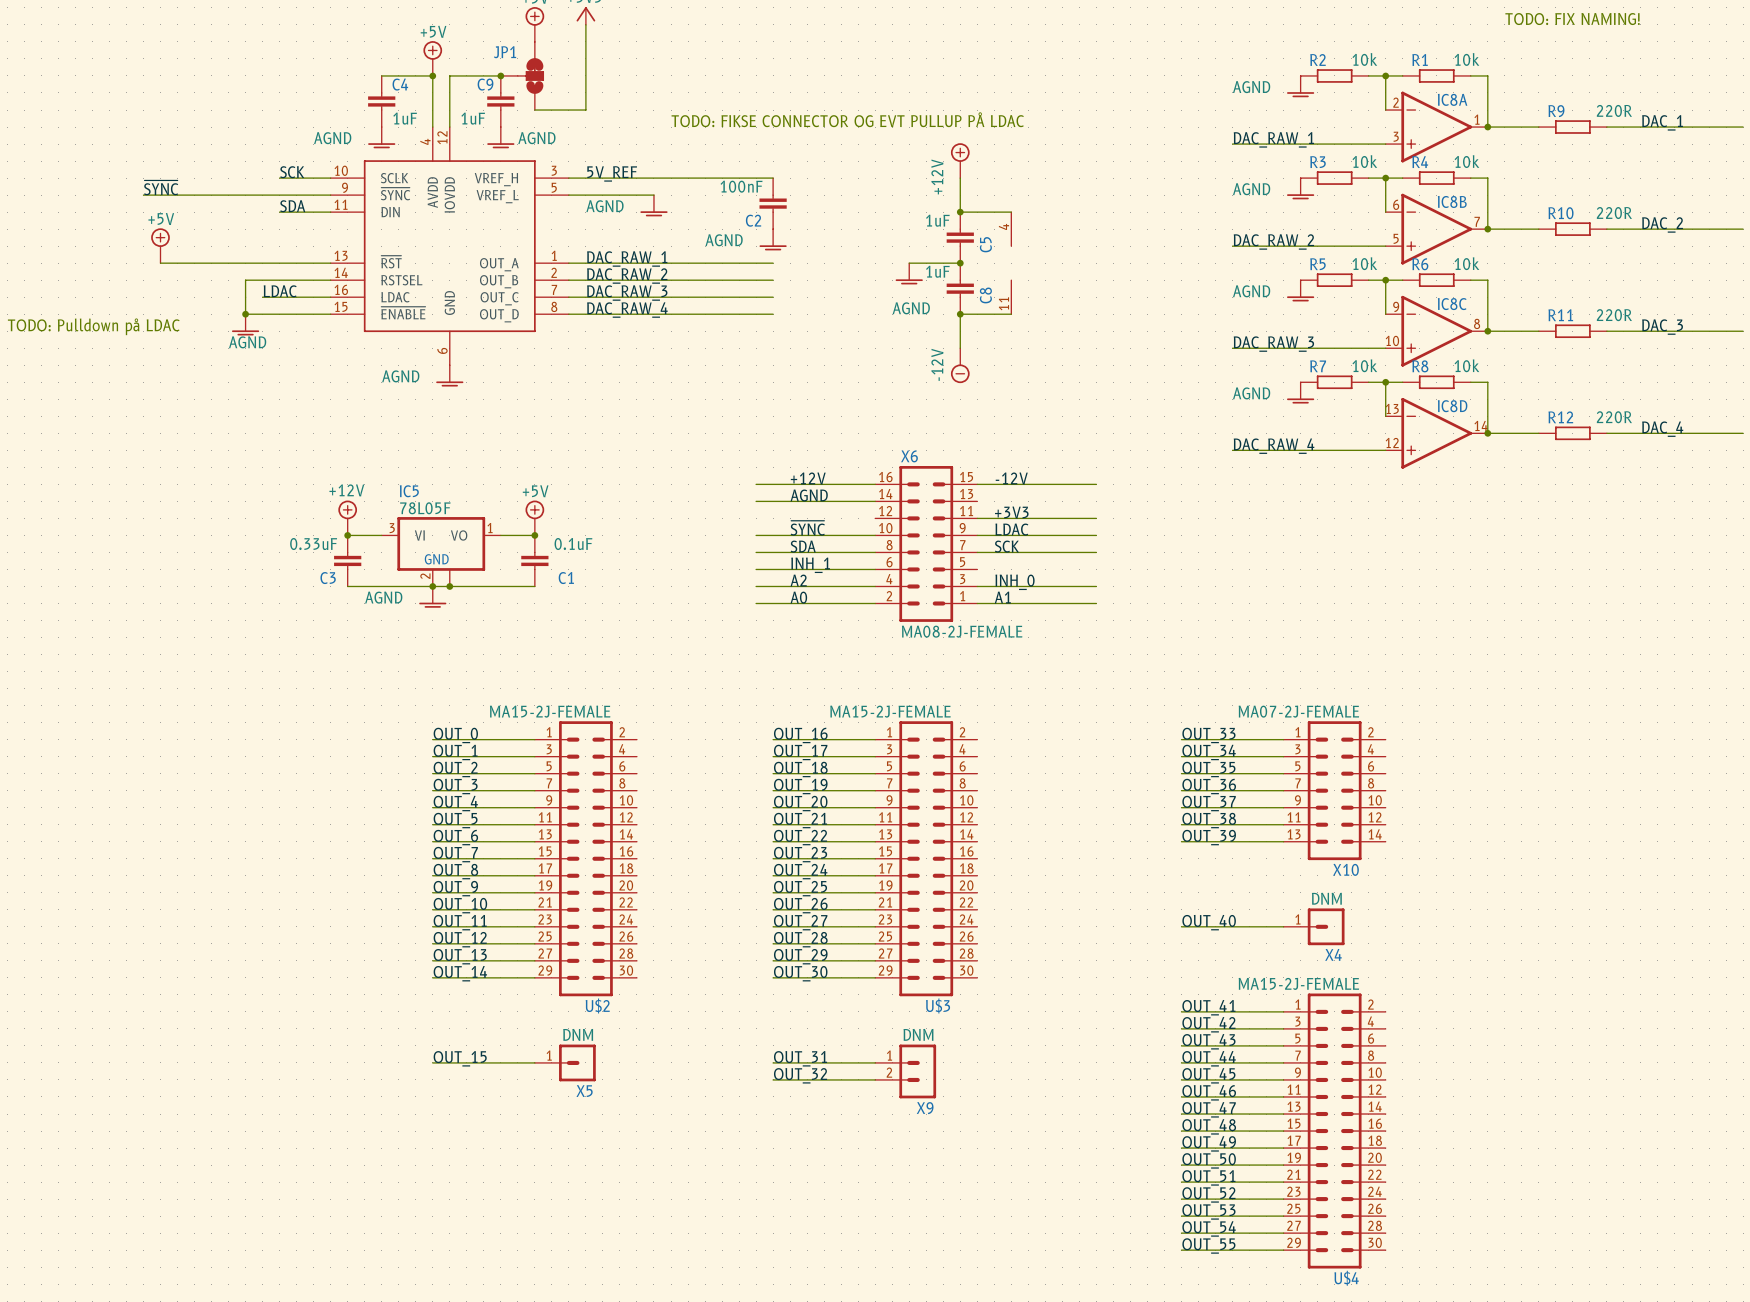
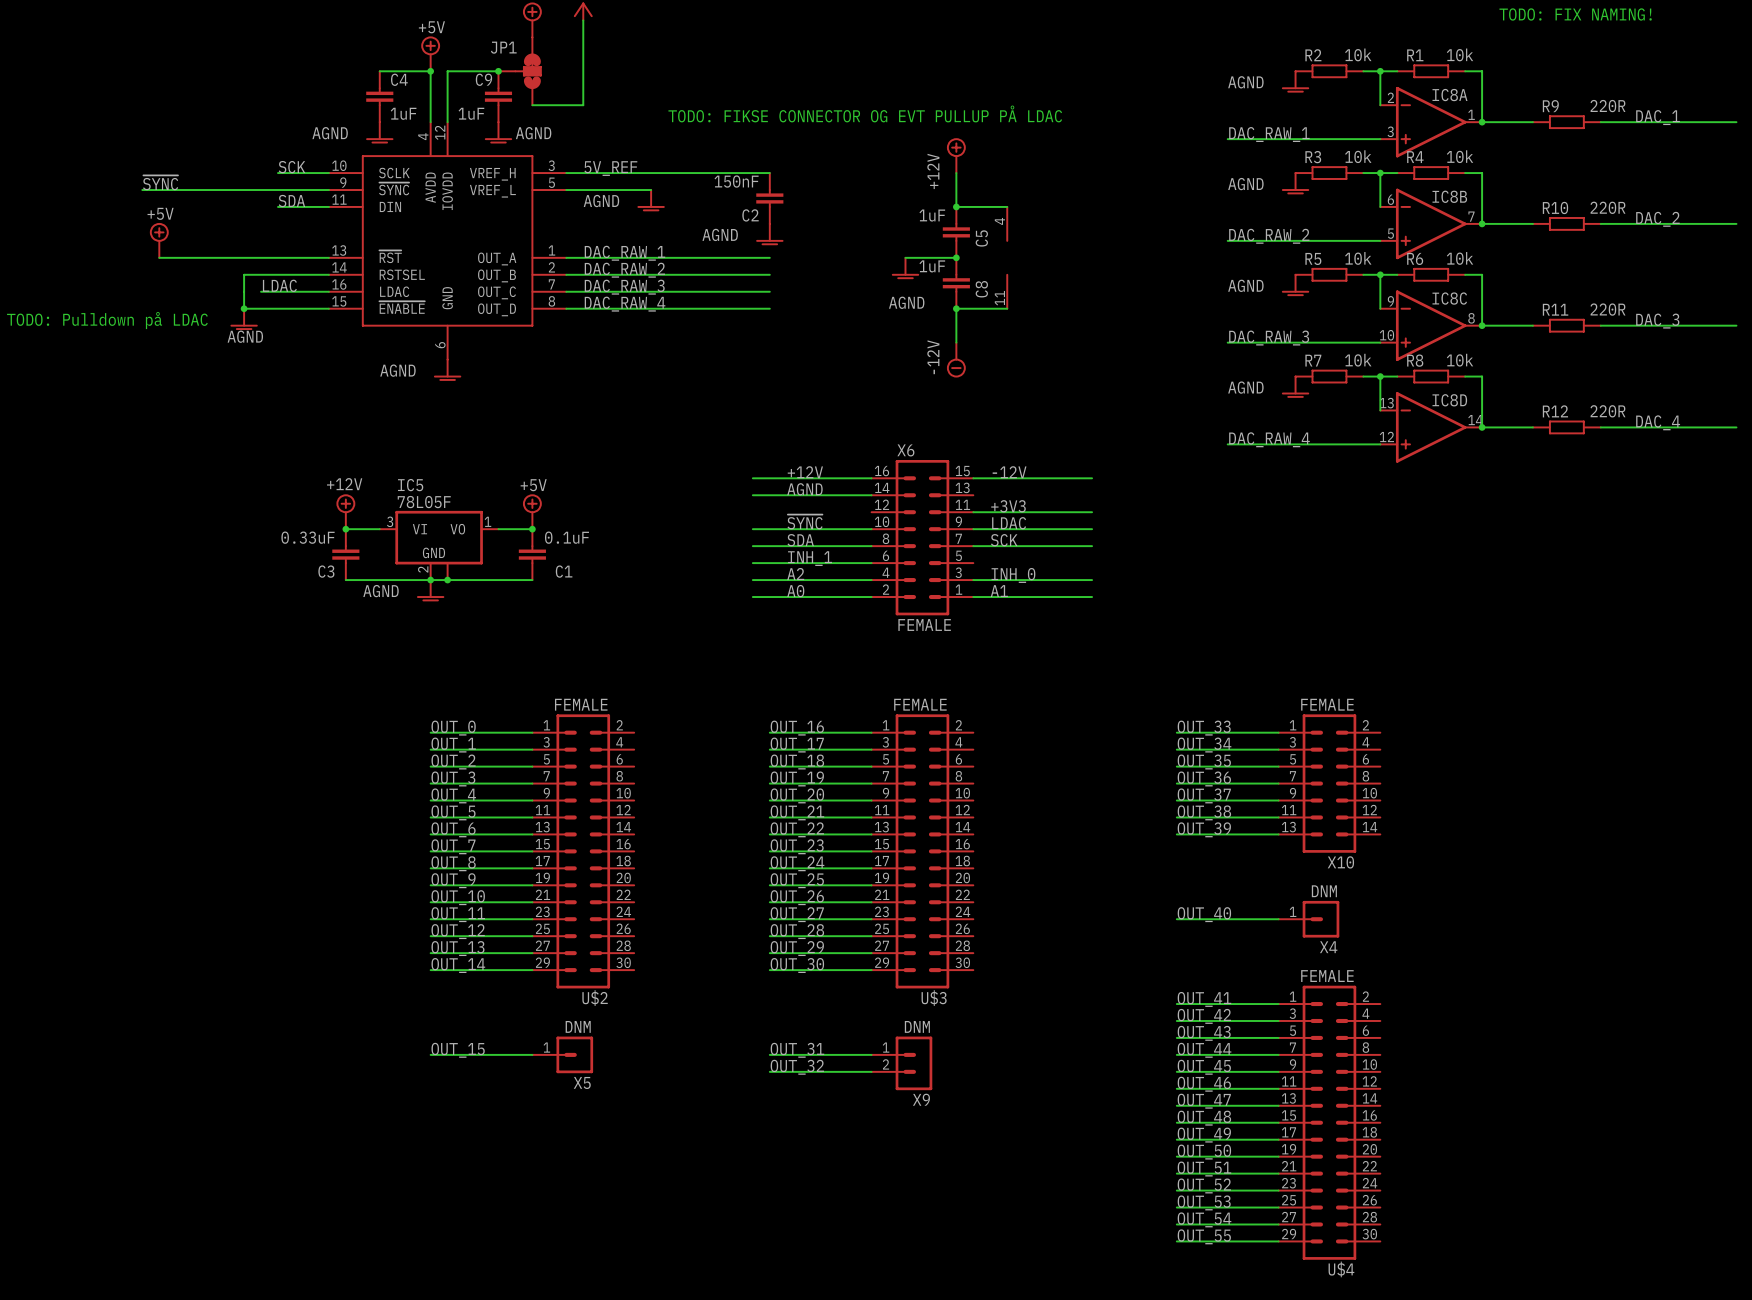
C2 value: 100nF (741, 186) -> 150nF (736, 181)
X6 value: MA08-2J-FEMALE (962, 631) -> FEMALE (924, 625)
U$2 value: MA15-2J-FEMALE (550, 711) -> FEMALE (581, 704)
U$3 value: MA15-2J-FEMALE (890, 711) -> FEMALE (920, 704)
X10 value: MA07-2J-FEMALE (1298, 711) -> FEMALE (1327, 704)
U$4 value: MA15-2J-FEMALE (1298, 983) -> FEMALE (1327, 976)

